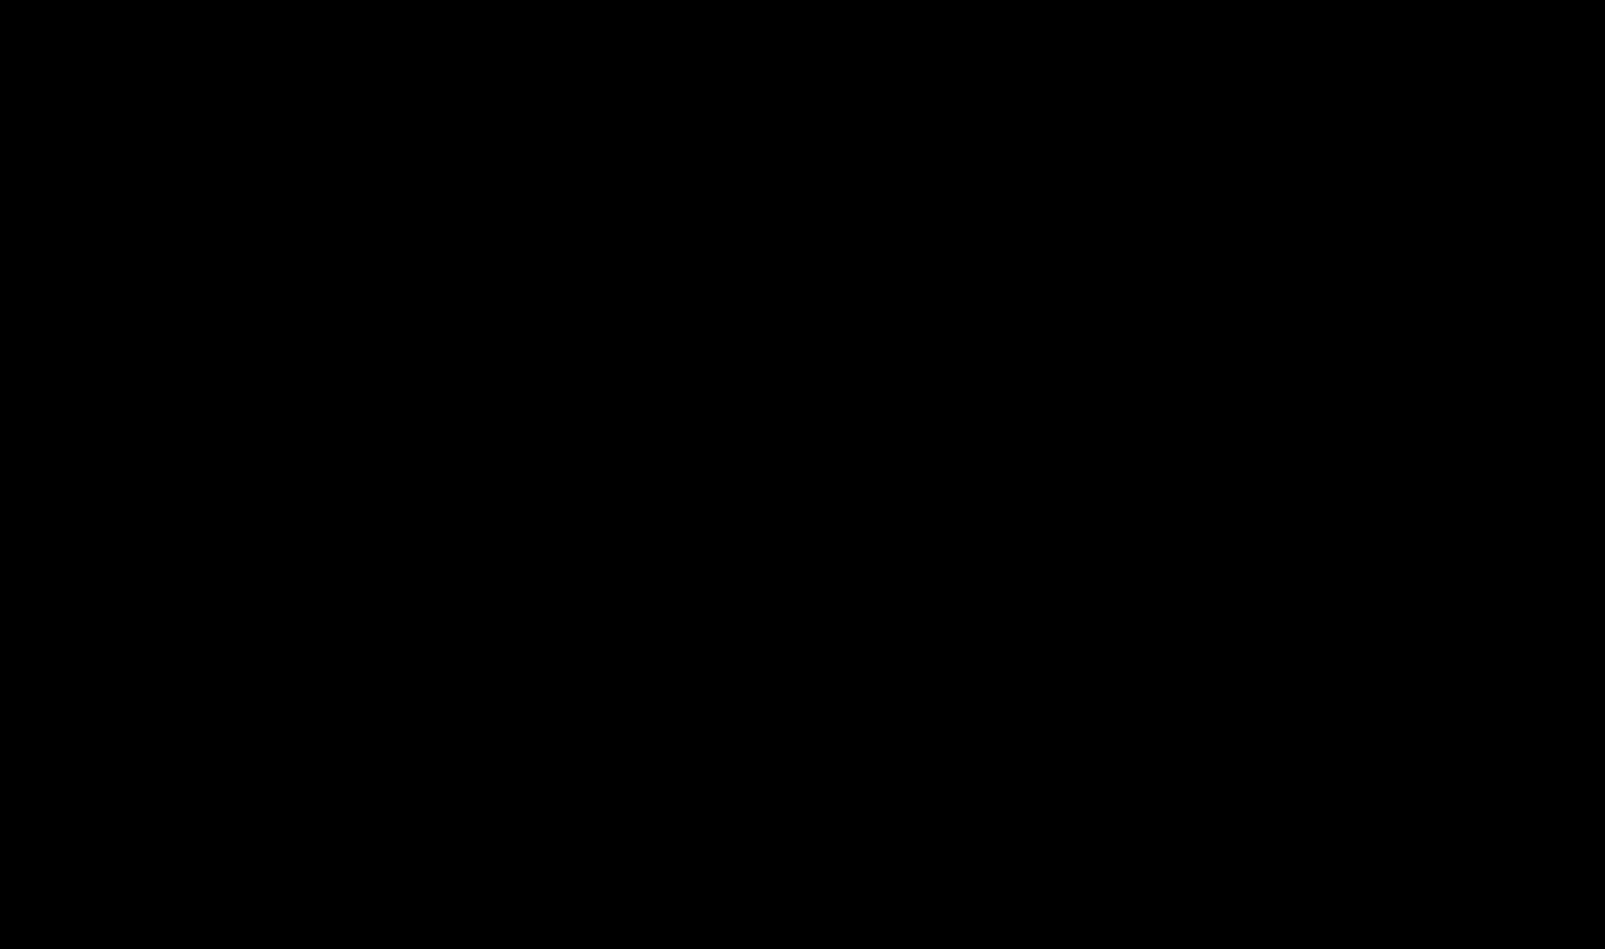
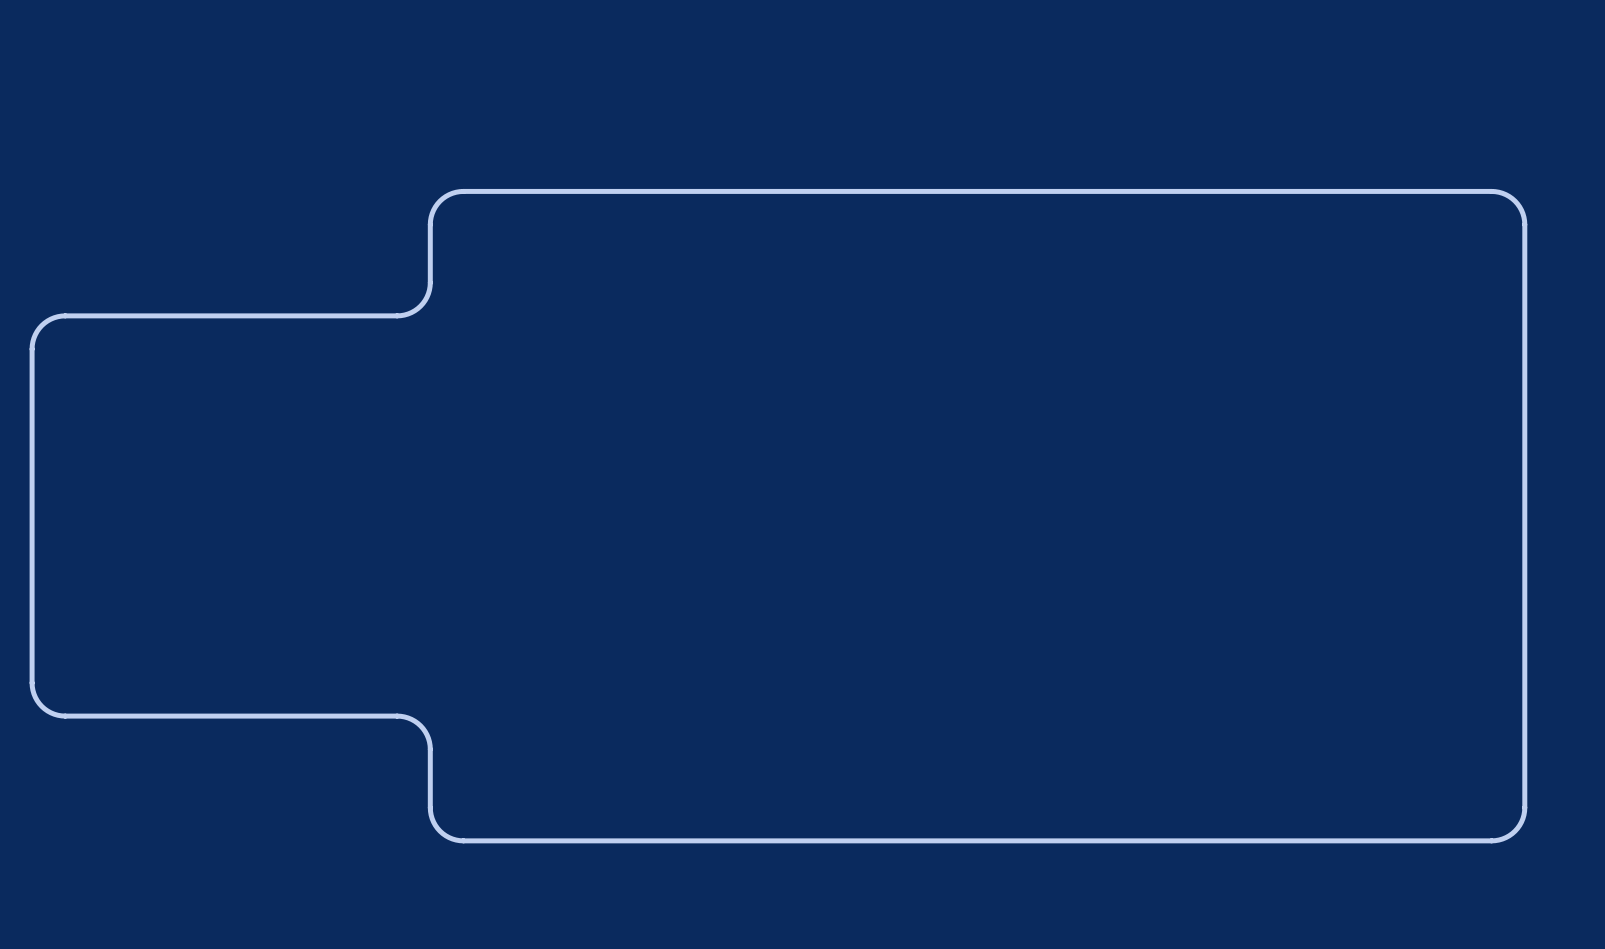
board edge: none -> (463, 191) (1491, 191) (1509, 196) (1519, 206) (1524, 224) (1524, 807) (1519, 825) (1506, 837) (1491, 840) (459, 840) (445, 835) (433, 822) (430, 807) (429, 741) (420, 725) (408, 717) (397, 716) (65, 716) (54, 714) (44, 708) (35, 697) (32, 682) (32, 349) (33, 338) (39, 328) (50, 319) (65, 315) (397, 315) (408, 314) (420, 306) (429, 290) (430, 224) (433, 210) (445, 196) (463, 191)

